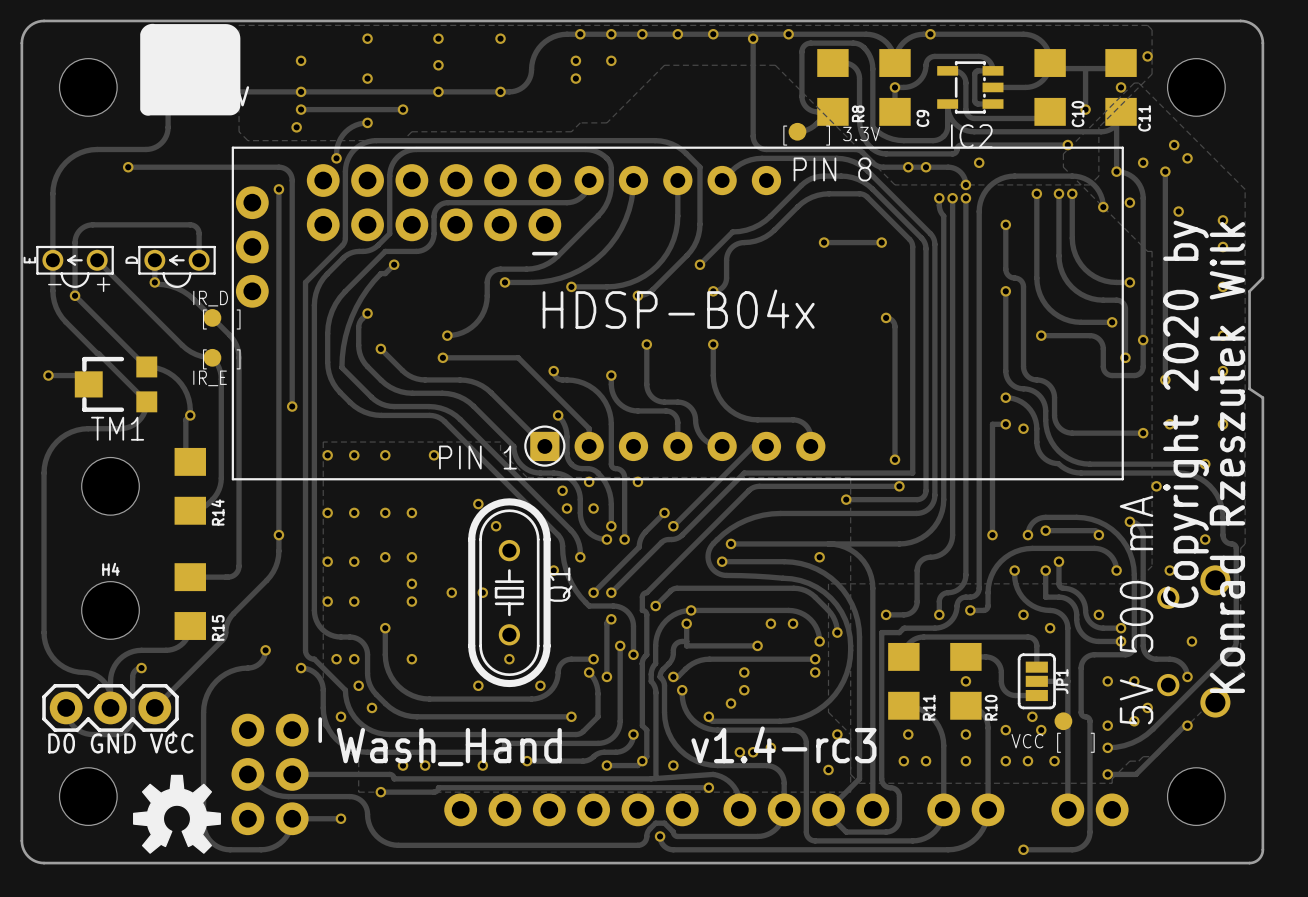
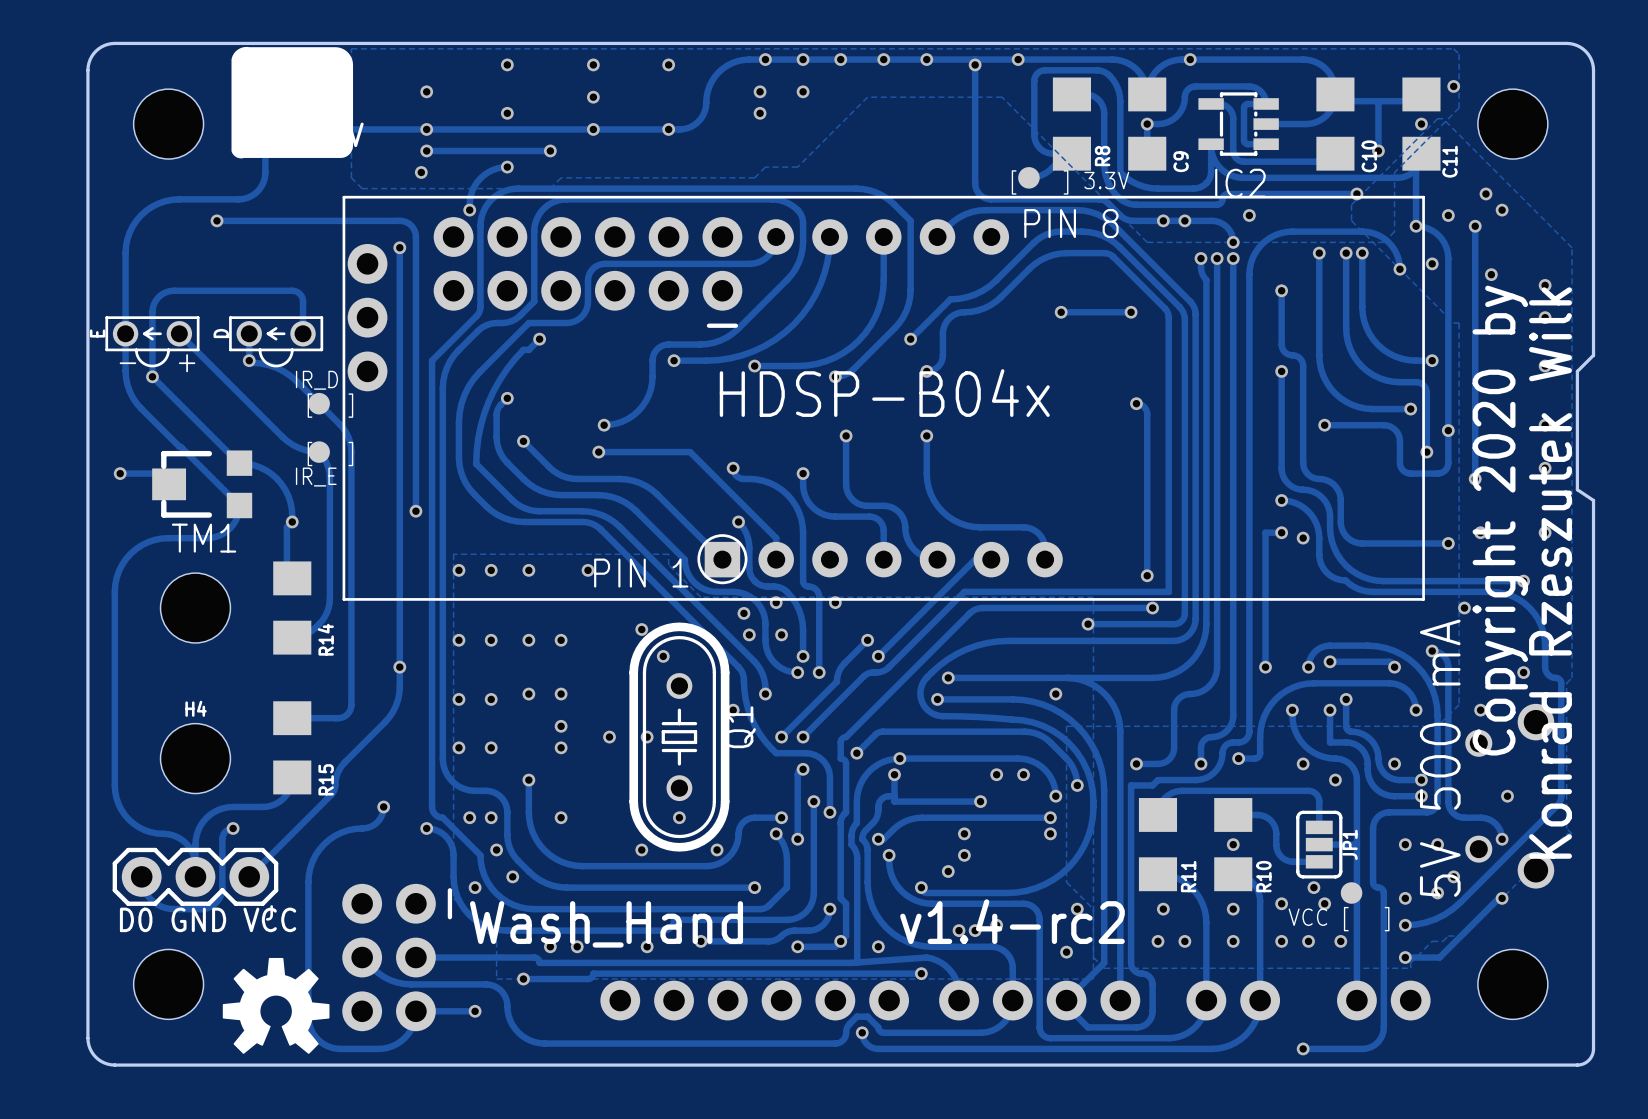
text: v1.4-rc3 (783, 744) -> v1.4-rc2 (1012, 921)

